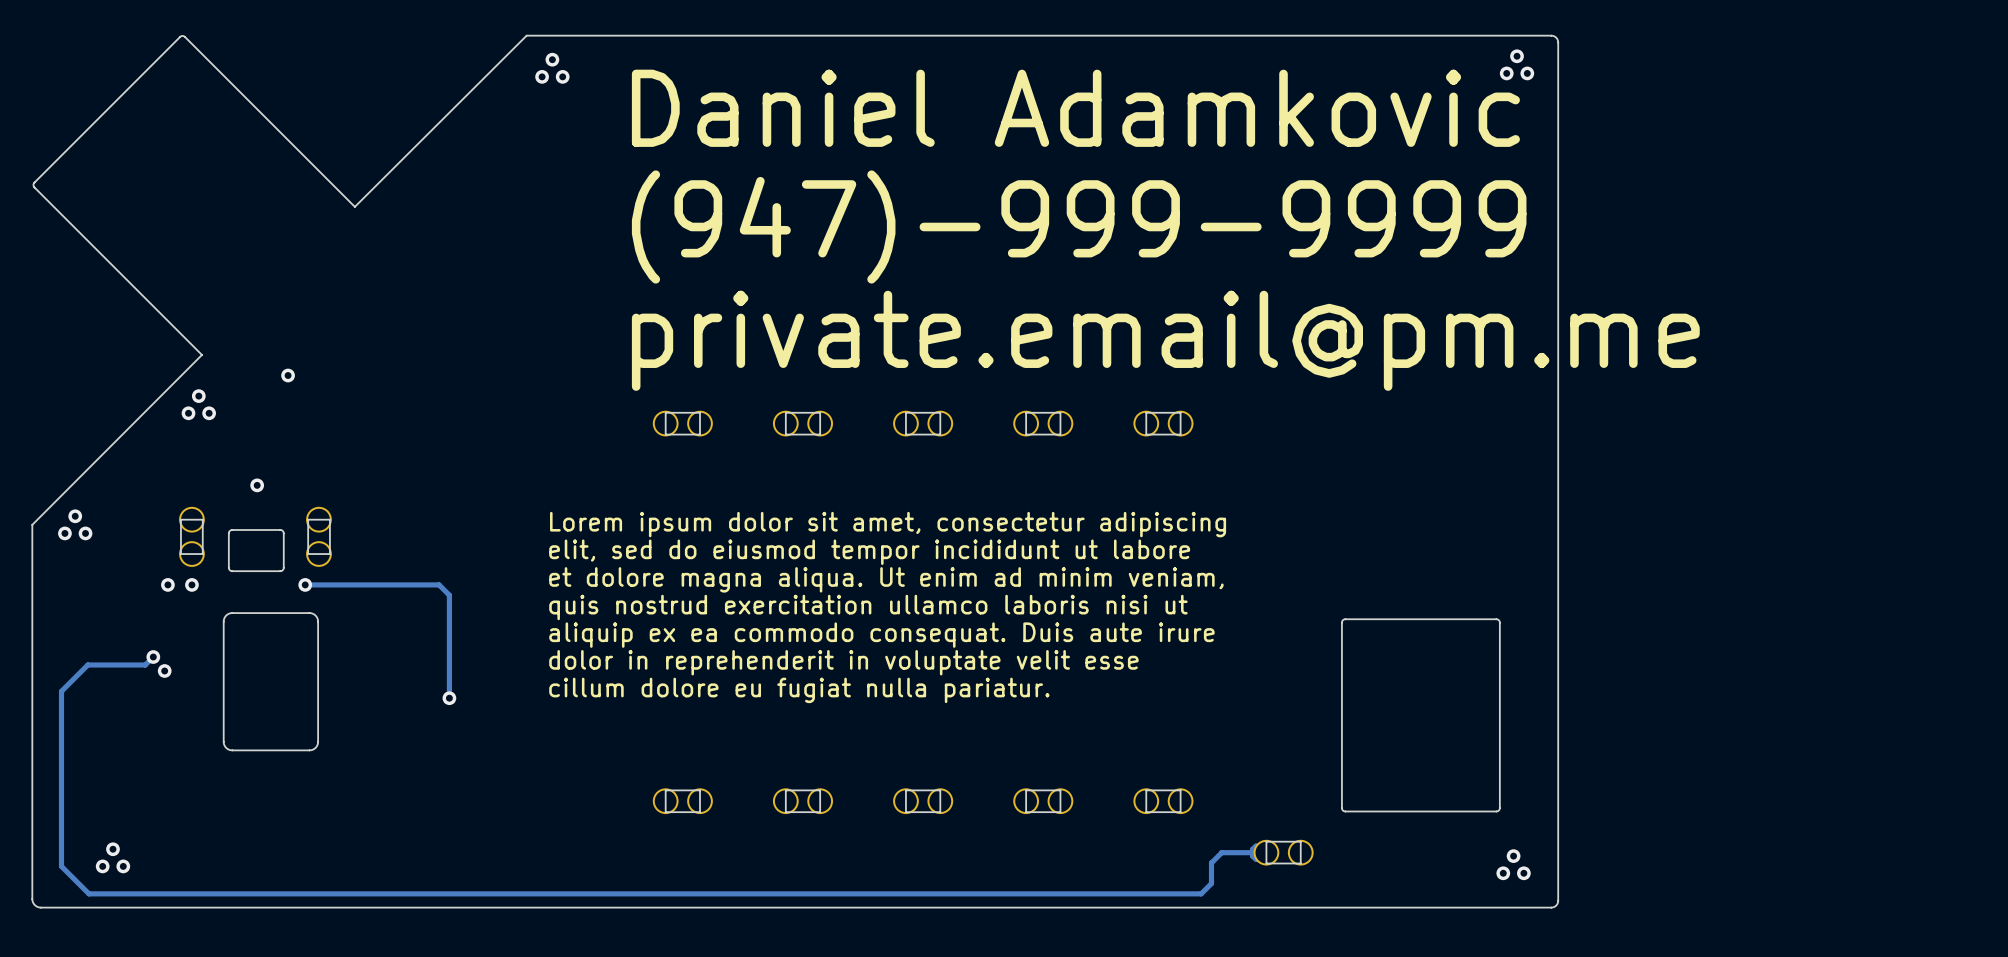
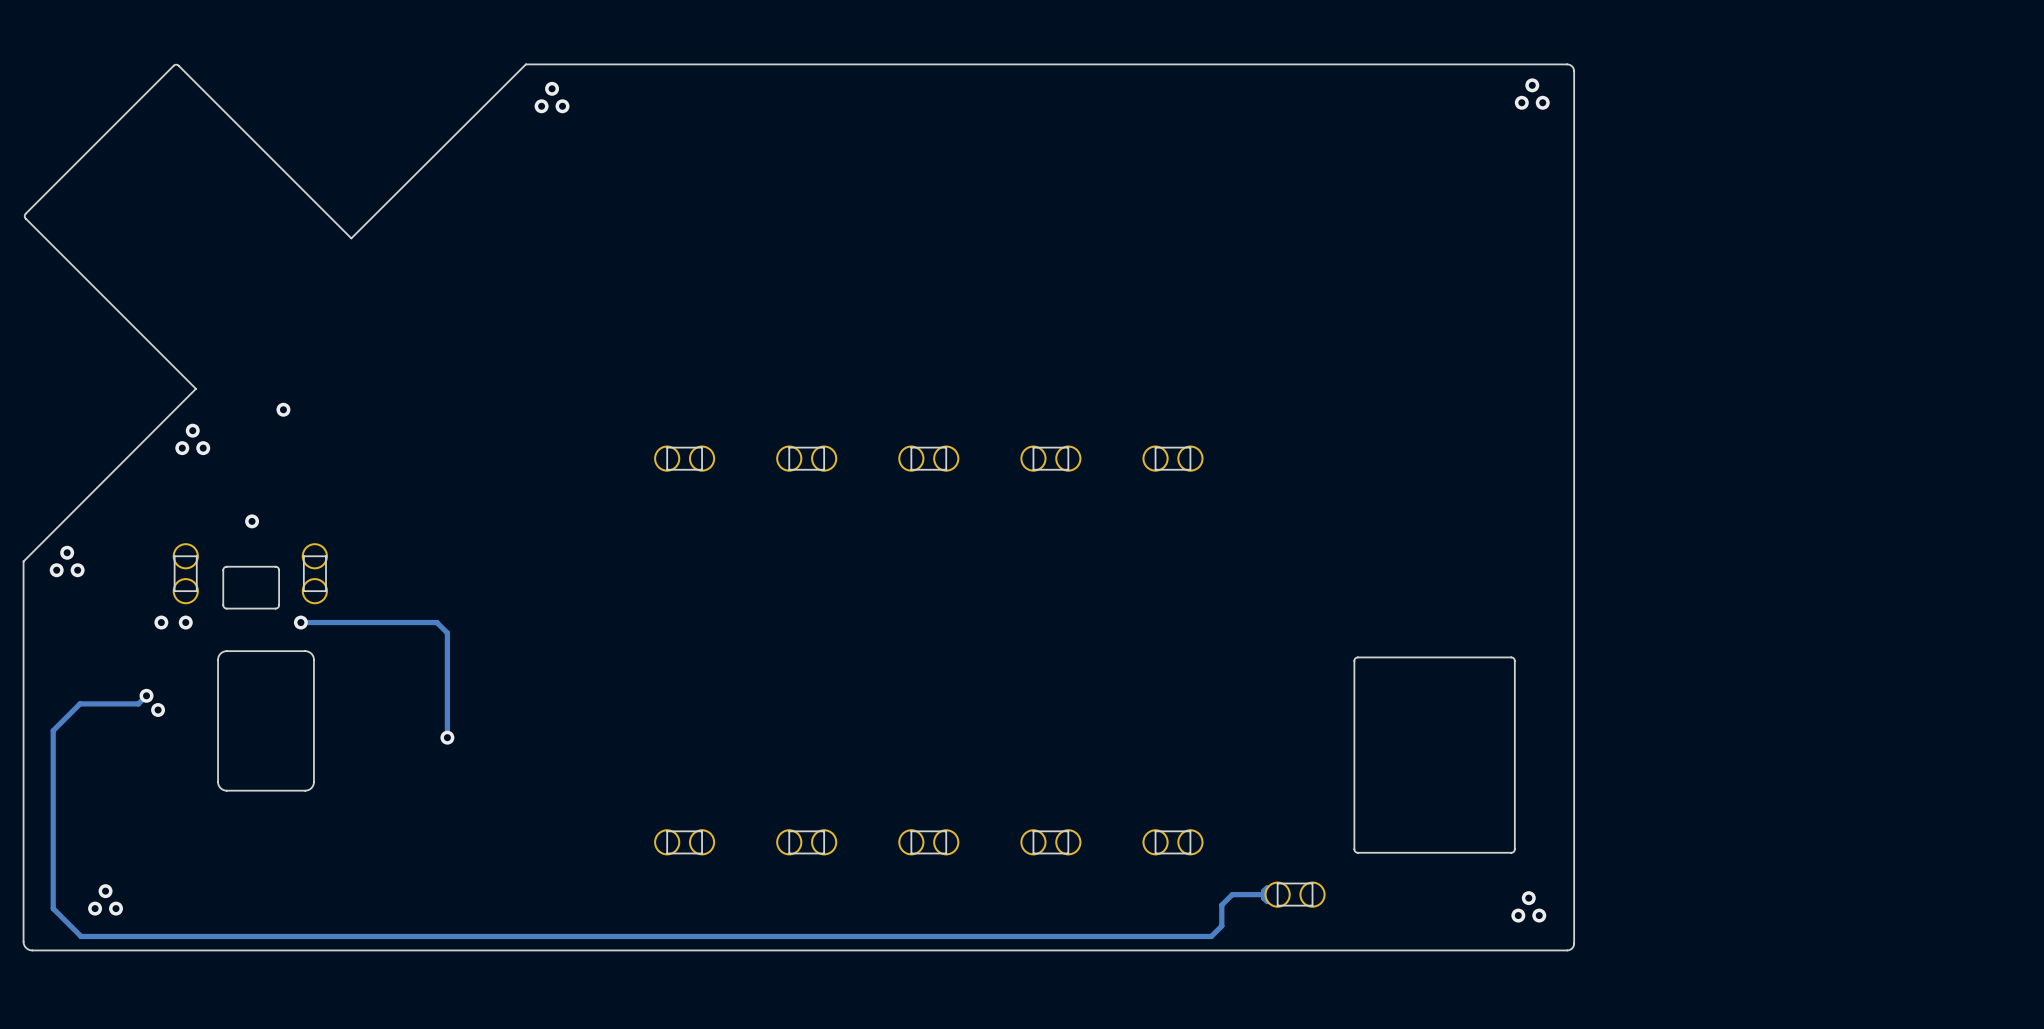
text: Daniel Adamkovic (1075, 108) -> none
text: (947)-999-9999 (1079, 226) -> none
text: private.email@pm.me (1165, 340) -> none
text: Lorem ipsum dolor sit amet, consectetur adipiscing (888, 524) -> none
text: elit, sed do eiusmod tempor incididunt ut labore (869, 552) -> none
text: et dolore magna aliqua. Ut enim ad minim veniam, (886, 579) -> none
text: quis nostrud exercitation ullamco laboris nisi ut (868, 607) -> none
text: aliquip ex ea commodo consequat. Duis aute irure (881, 635) -> none
text: dolor in reprehenderit in voluptate velit esse (843, 662) -> none
text: cillum dolore eu fugiat nulla pariatur. (799, 690) -> none

